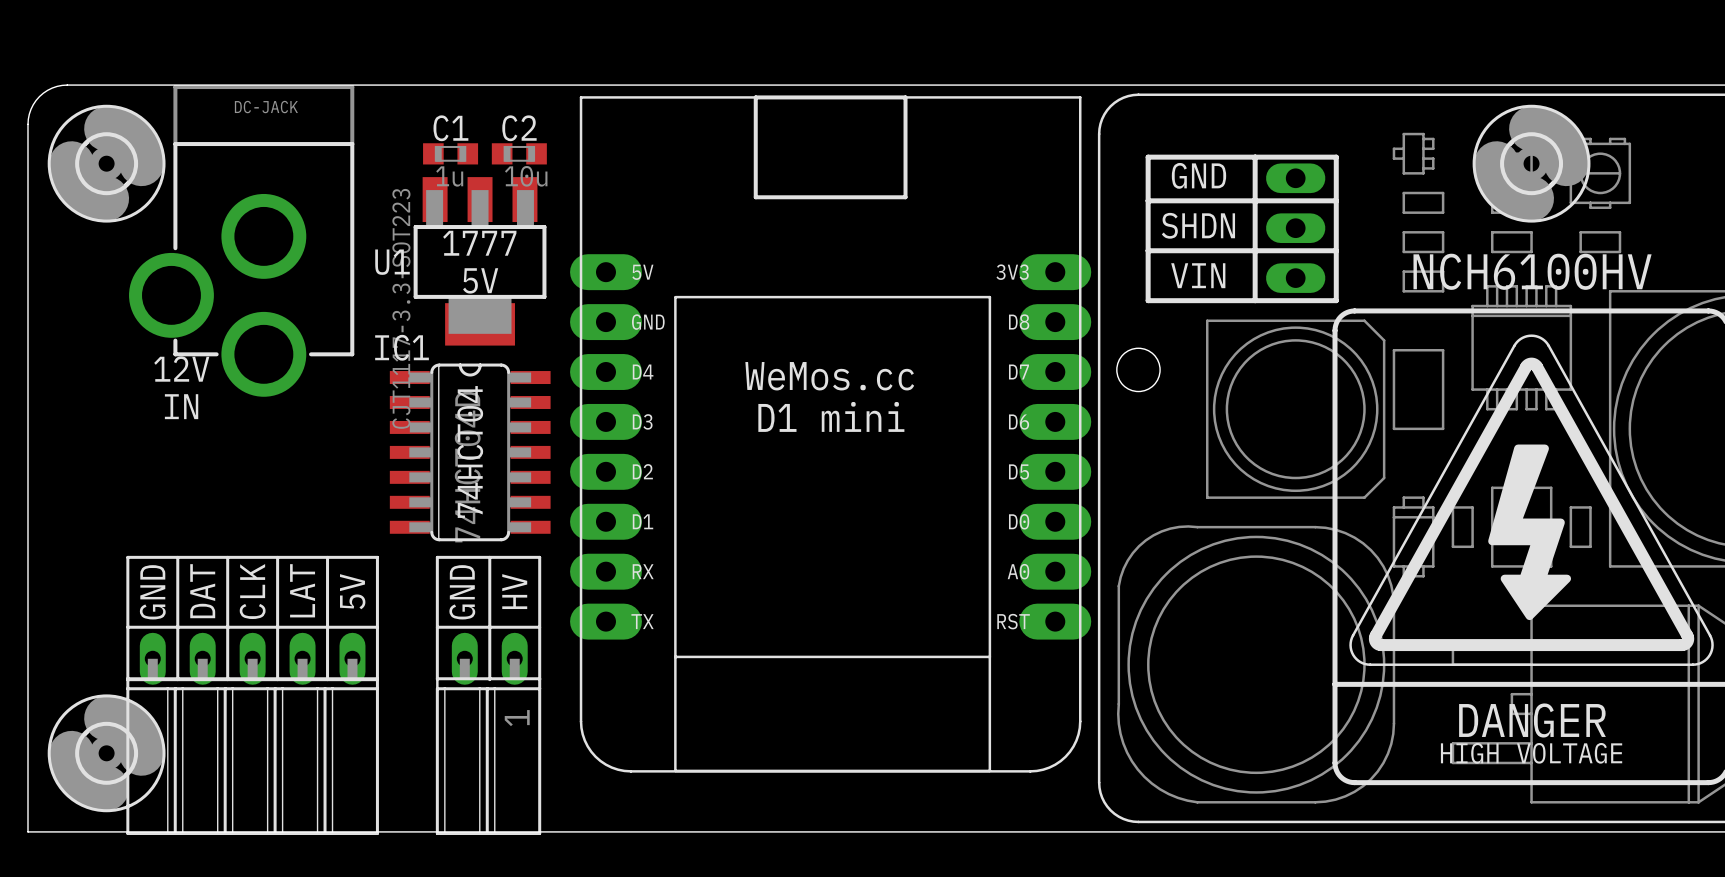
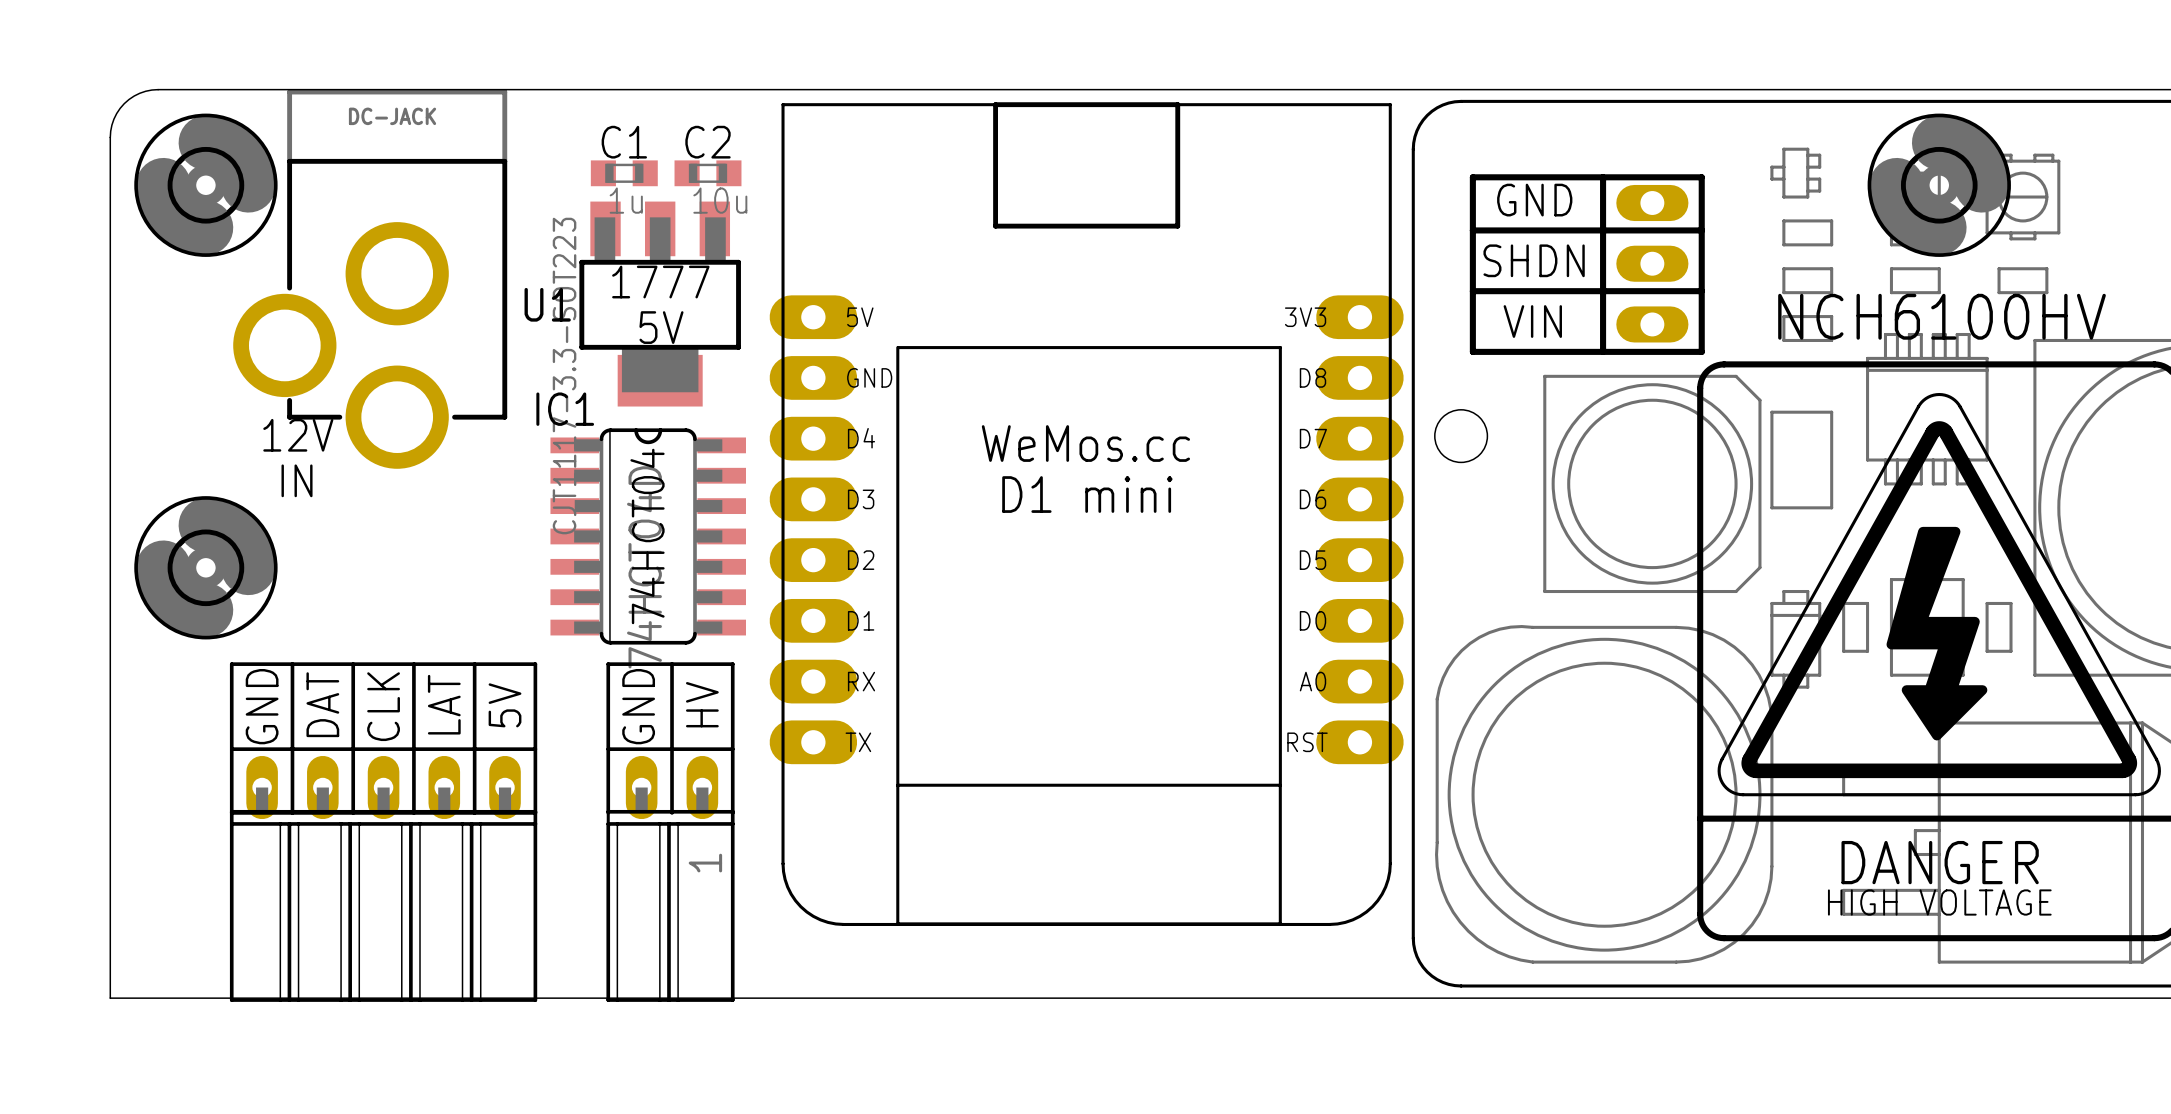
part position: (106, 753) -> (205, 567)

